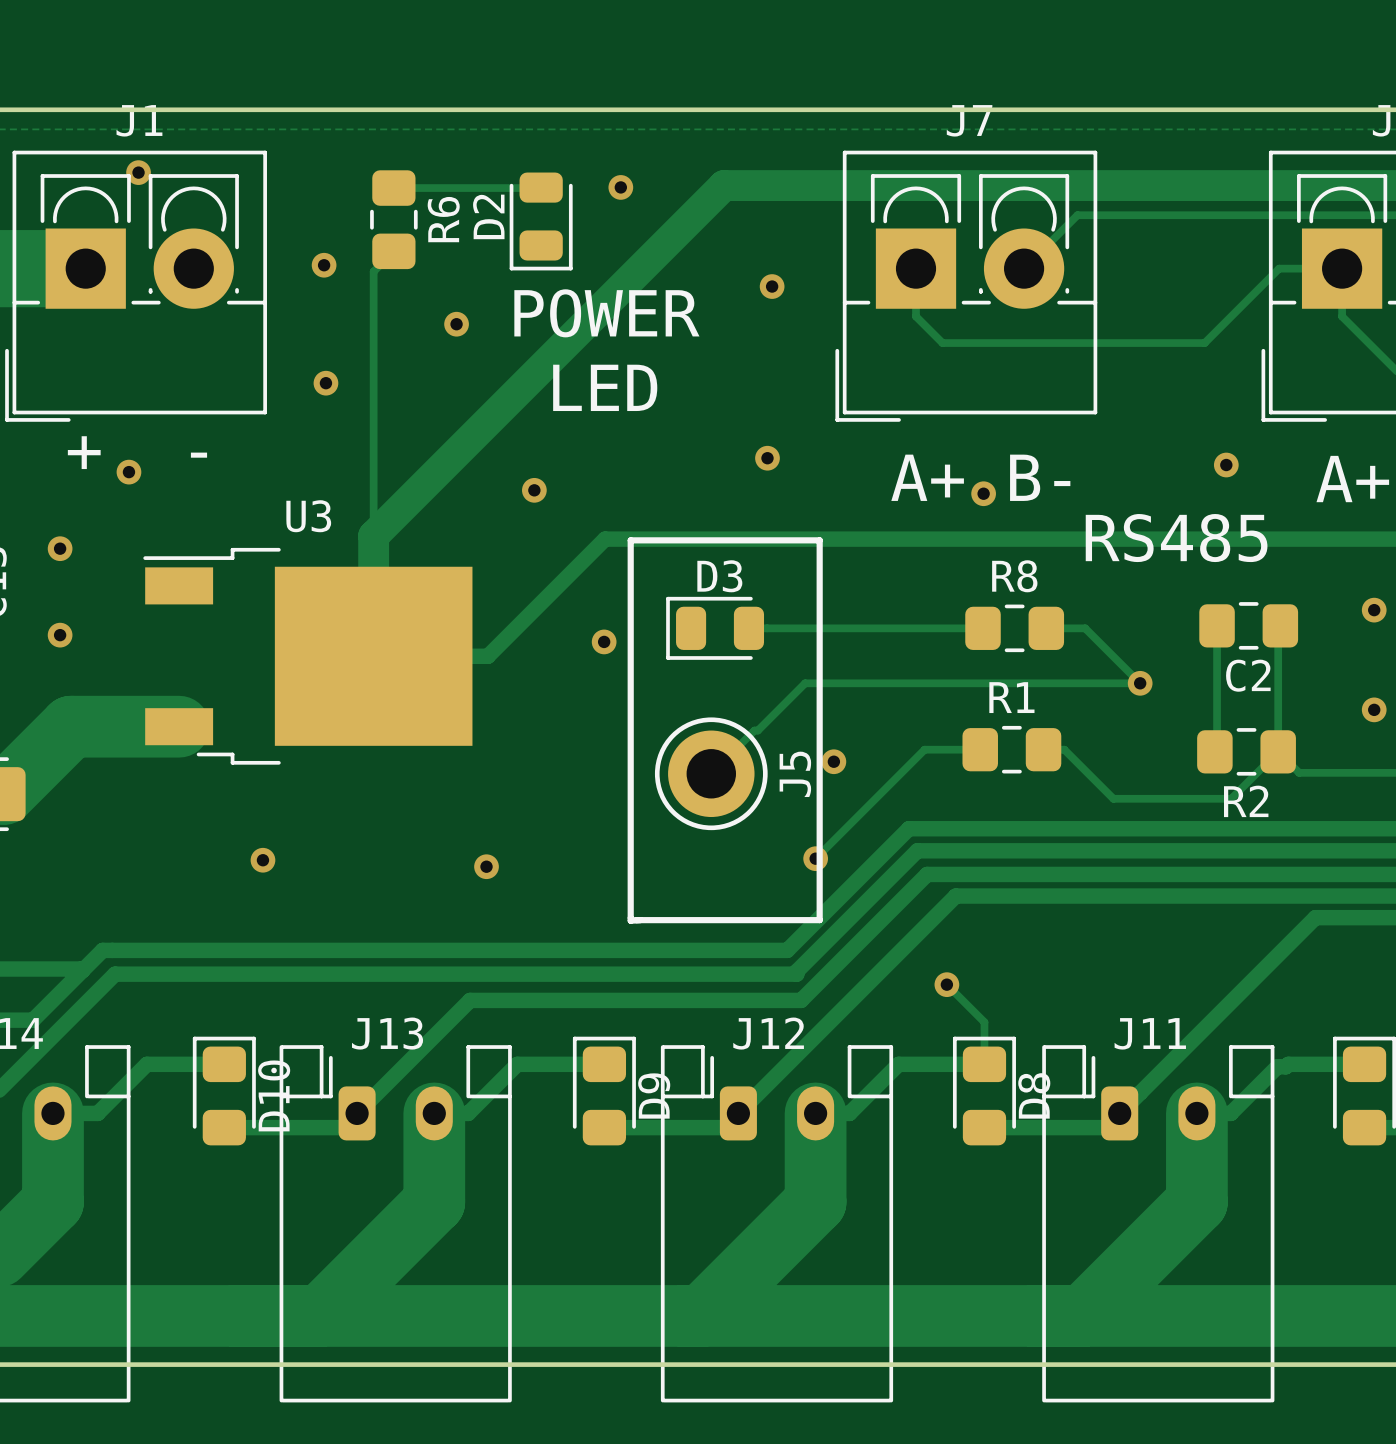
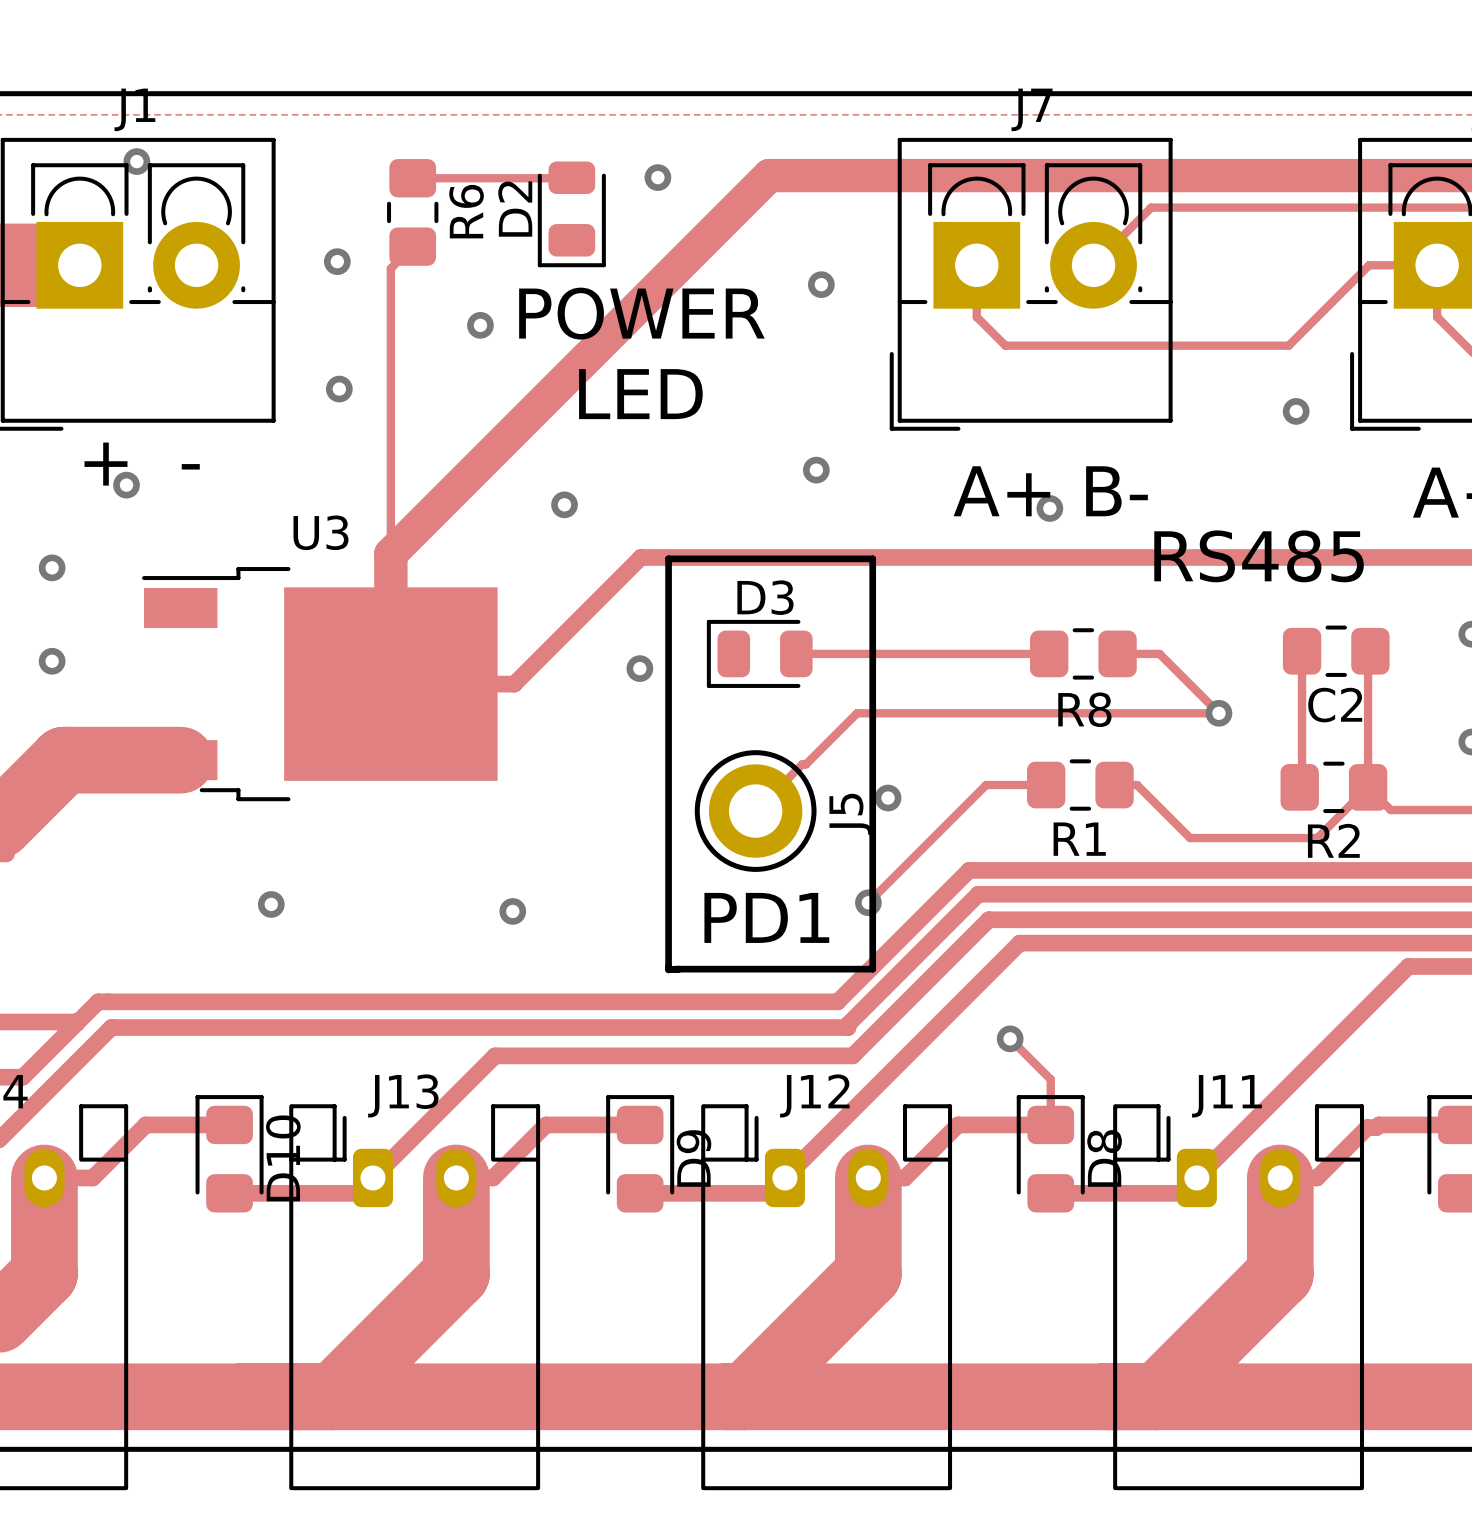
via position: (1226, 465) -> (1296, 411)
R8 name position: R8 (1014, 576) -> R8 (1084, 709)
R1 name position: R1 (1011, 697) -> R1 (1079, 839)
text: none -> PD1 (766, 917)

